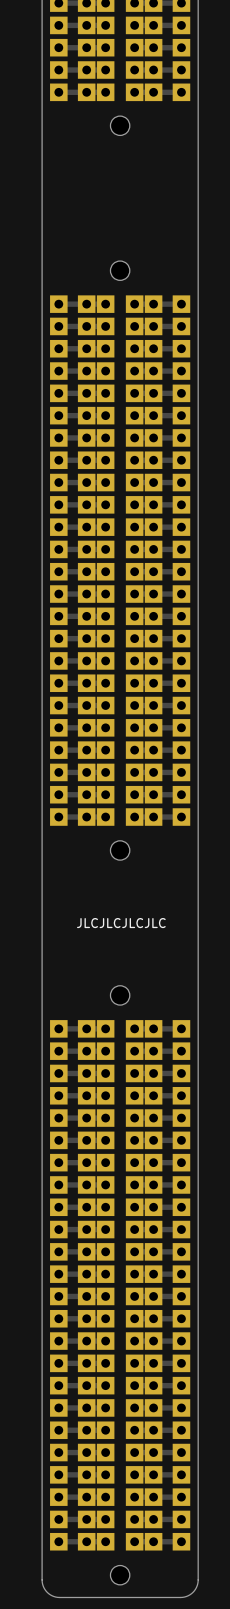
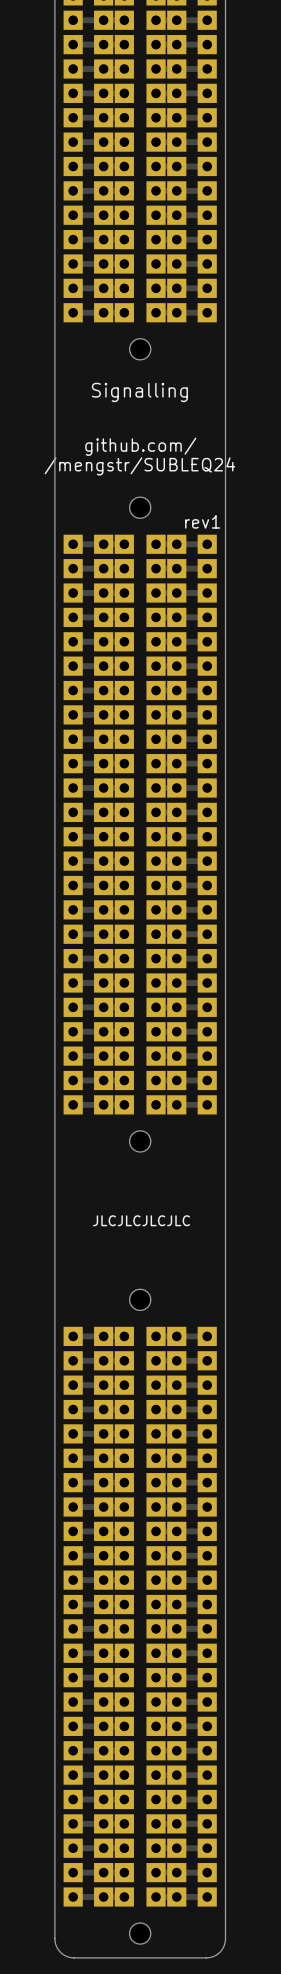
text: none -> Signalling (139, 392)
text: none -> github.com/ (140, 446)
text: none -> /mengstr/SUBLEQ24 (139, 466)
text: none -> rev1 (202, 521)

